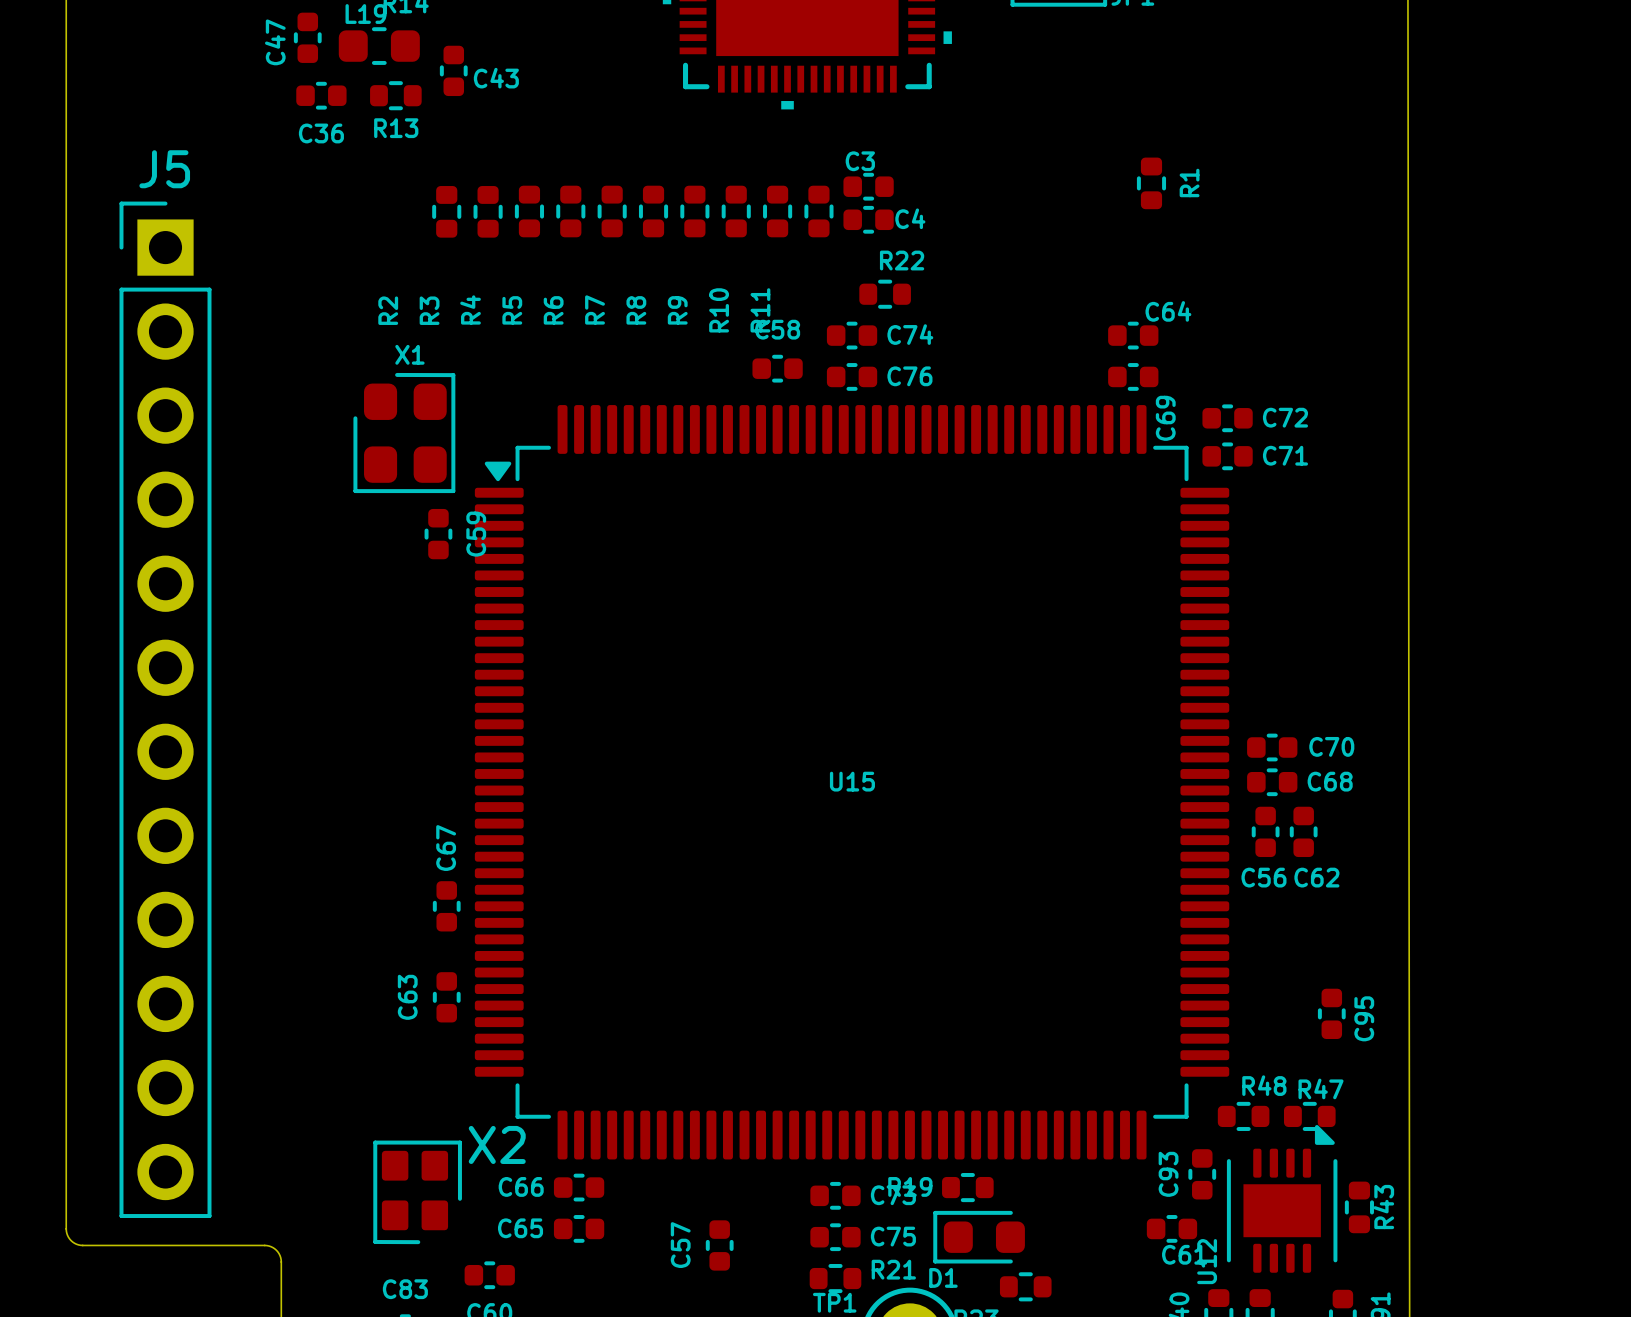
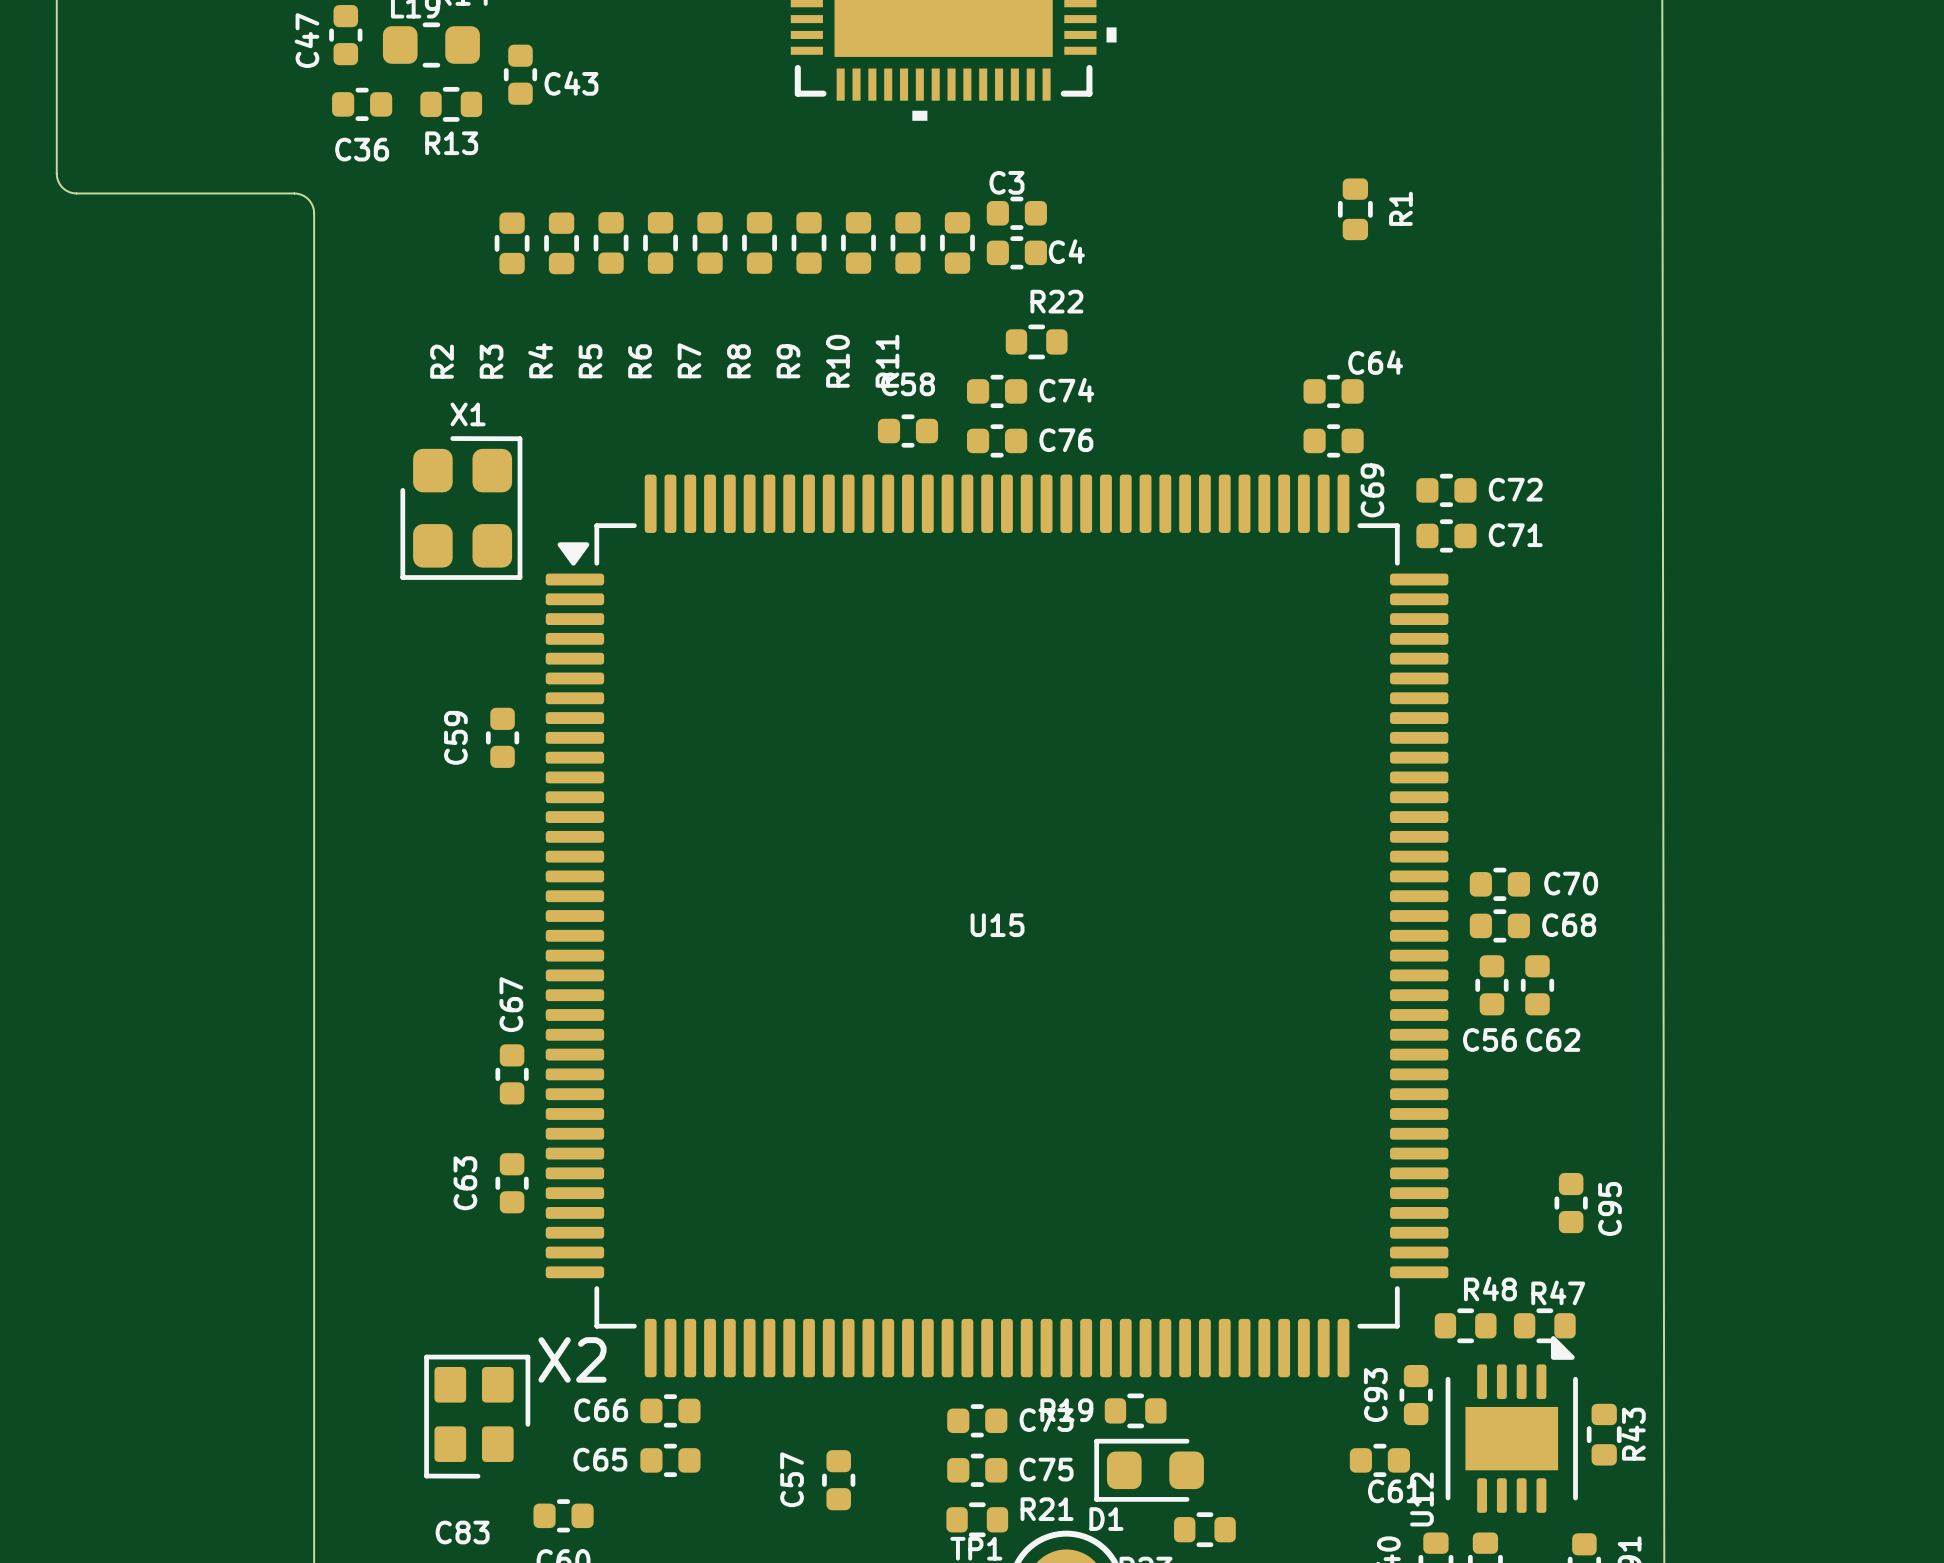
board edge: (66, 153) (66, 1231) (71, 1240) (80, 1245) (266, 1245) (276, 1250) (281, 1262) -> (56, 173) (60, 185) (66, 190) (73, 193) (296, 193) (308, 199) (313, 210) (314, 1499)
C59 position: (438, 534) -> (502, 737)
C59 name position: C59 (476, 534) -> C59 (455, 737)
J5: (165, 709) -> none

